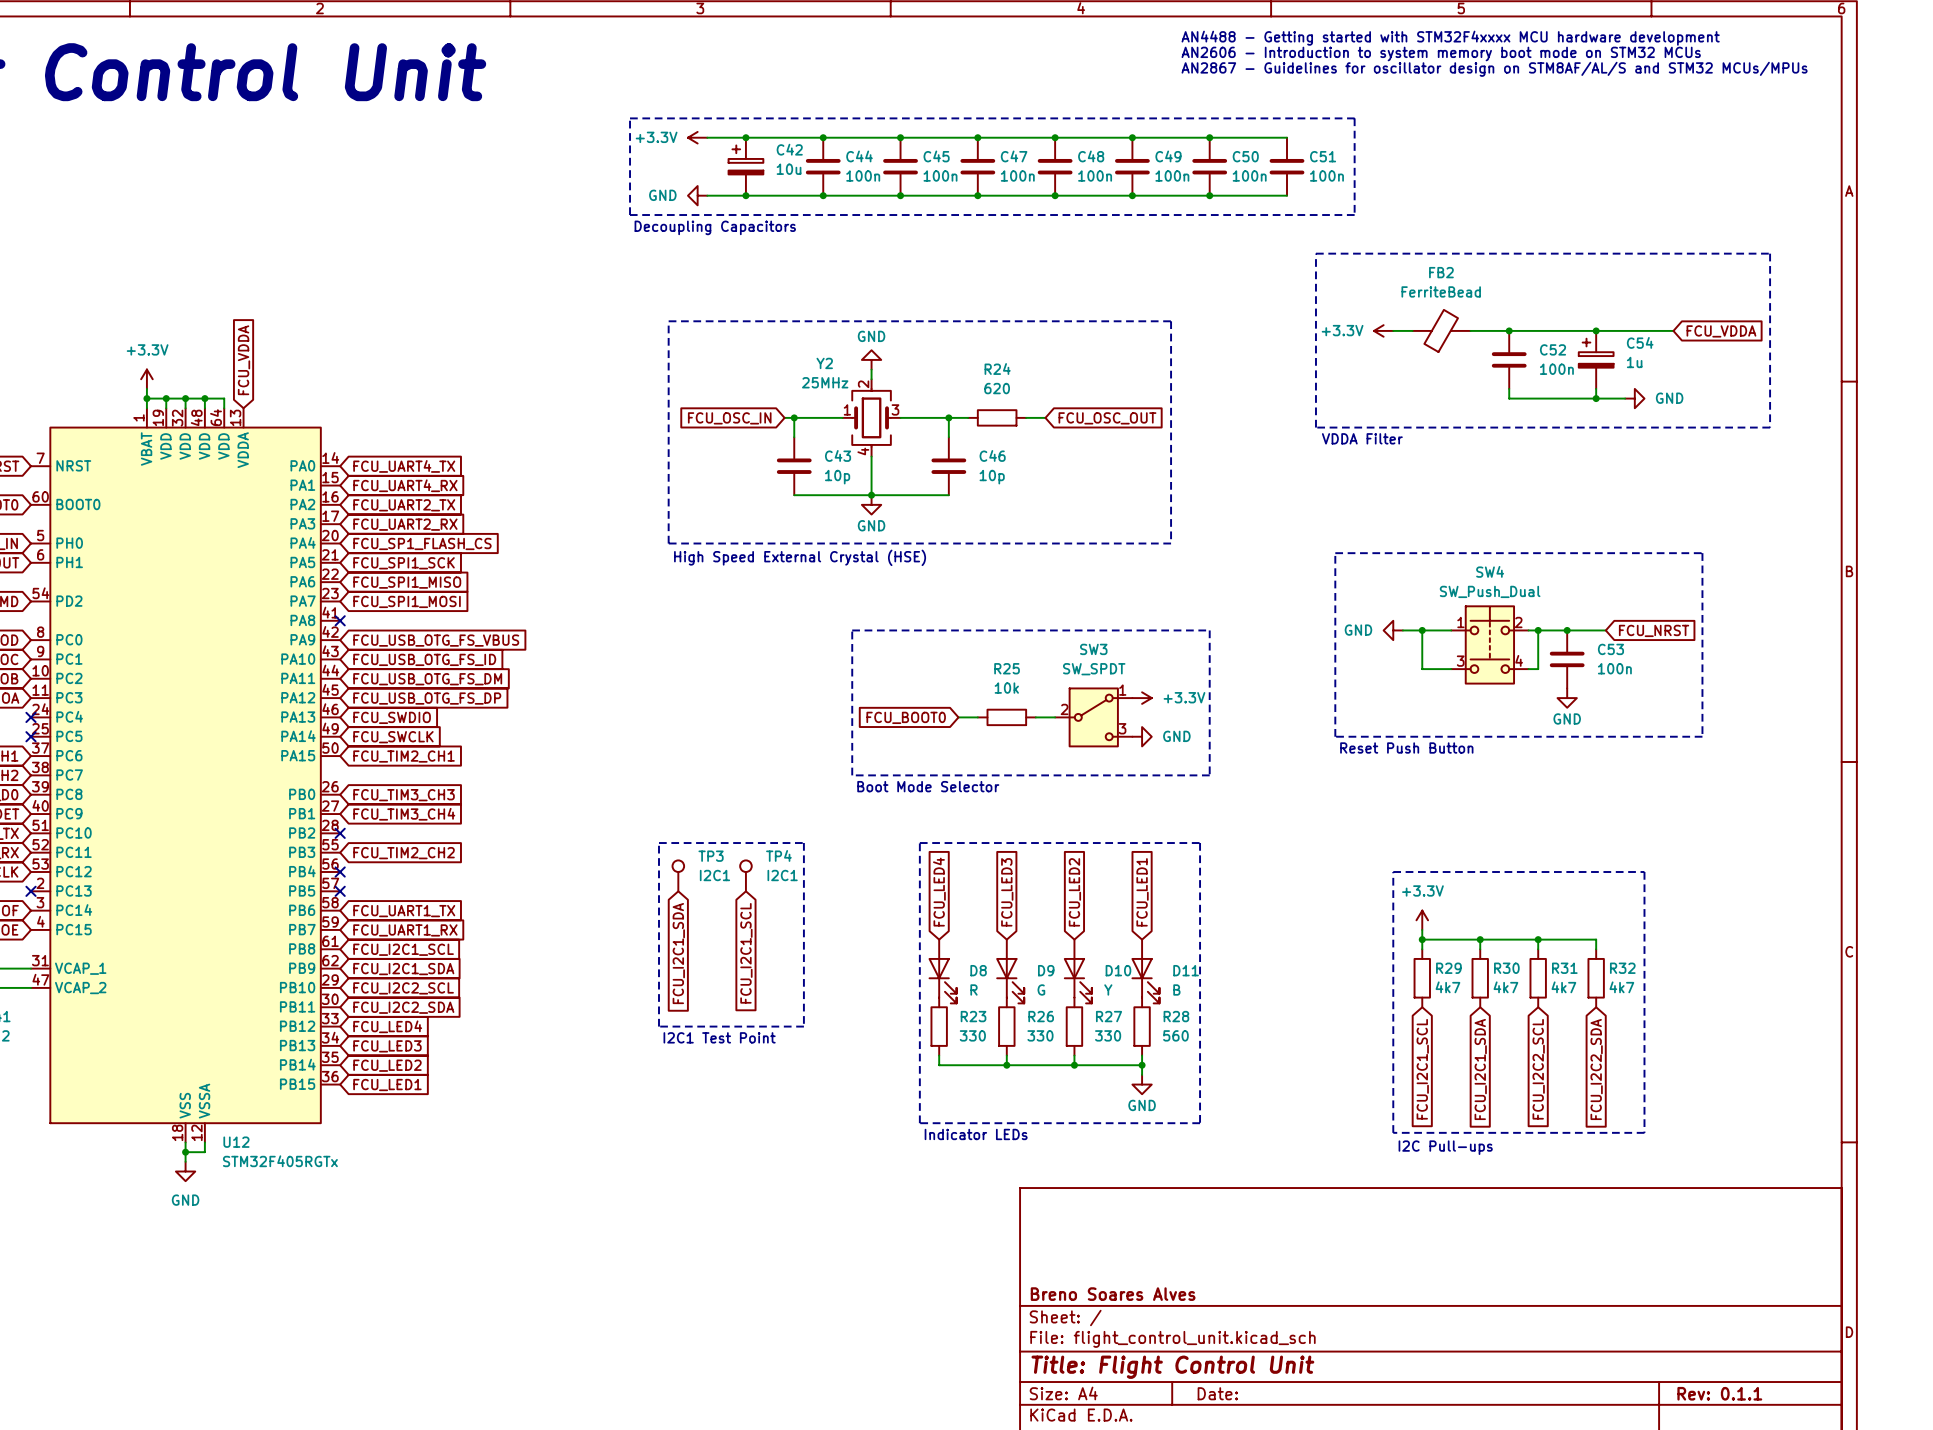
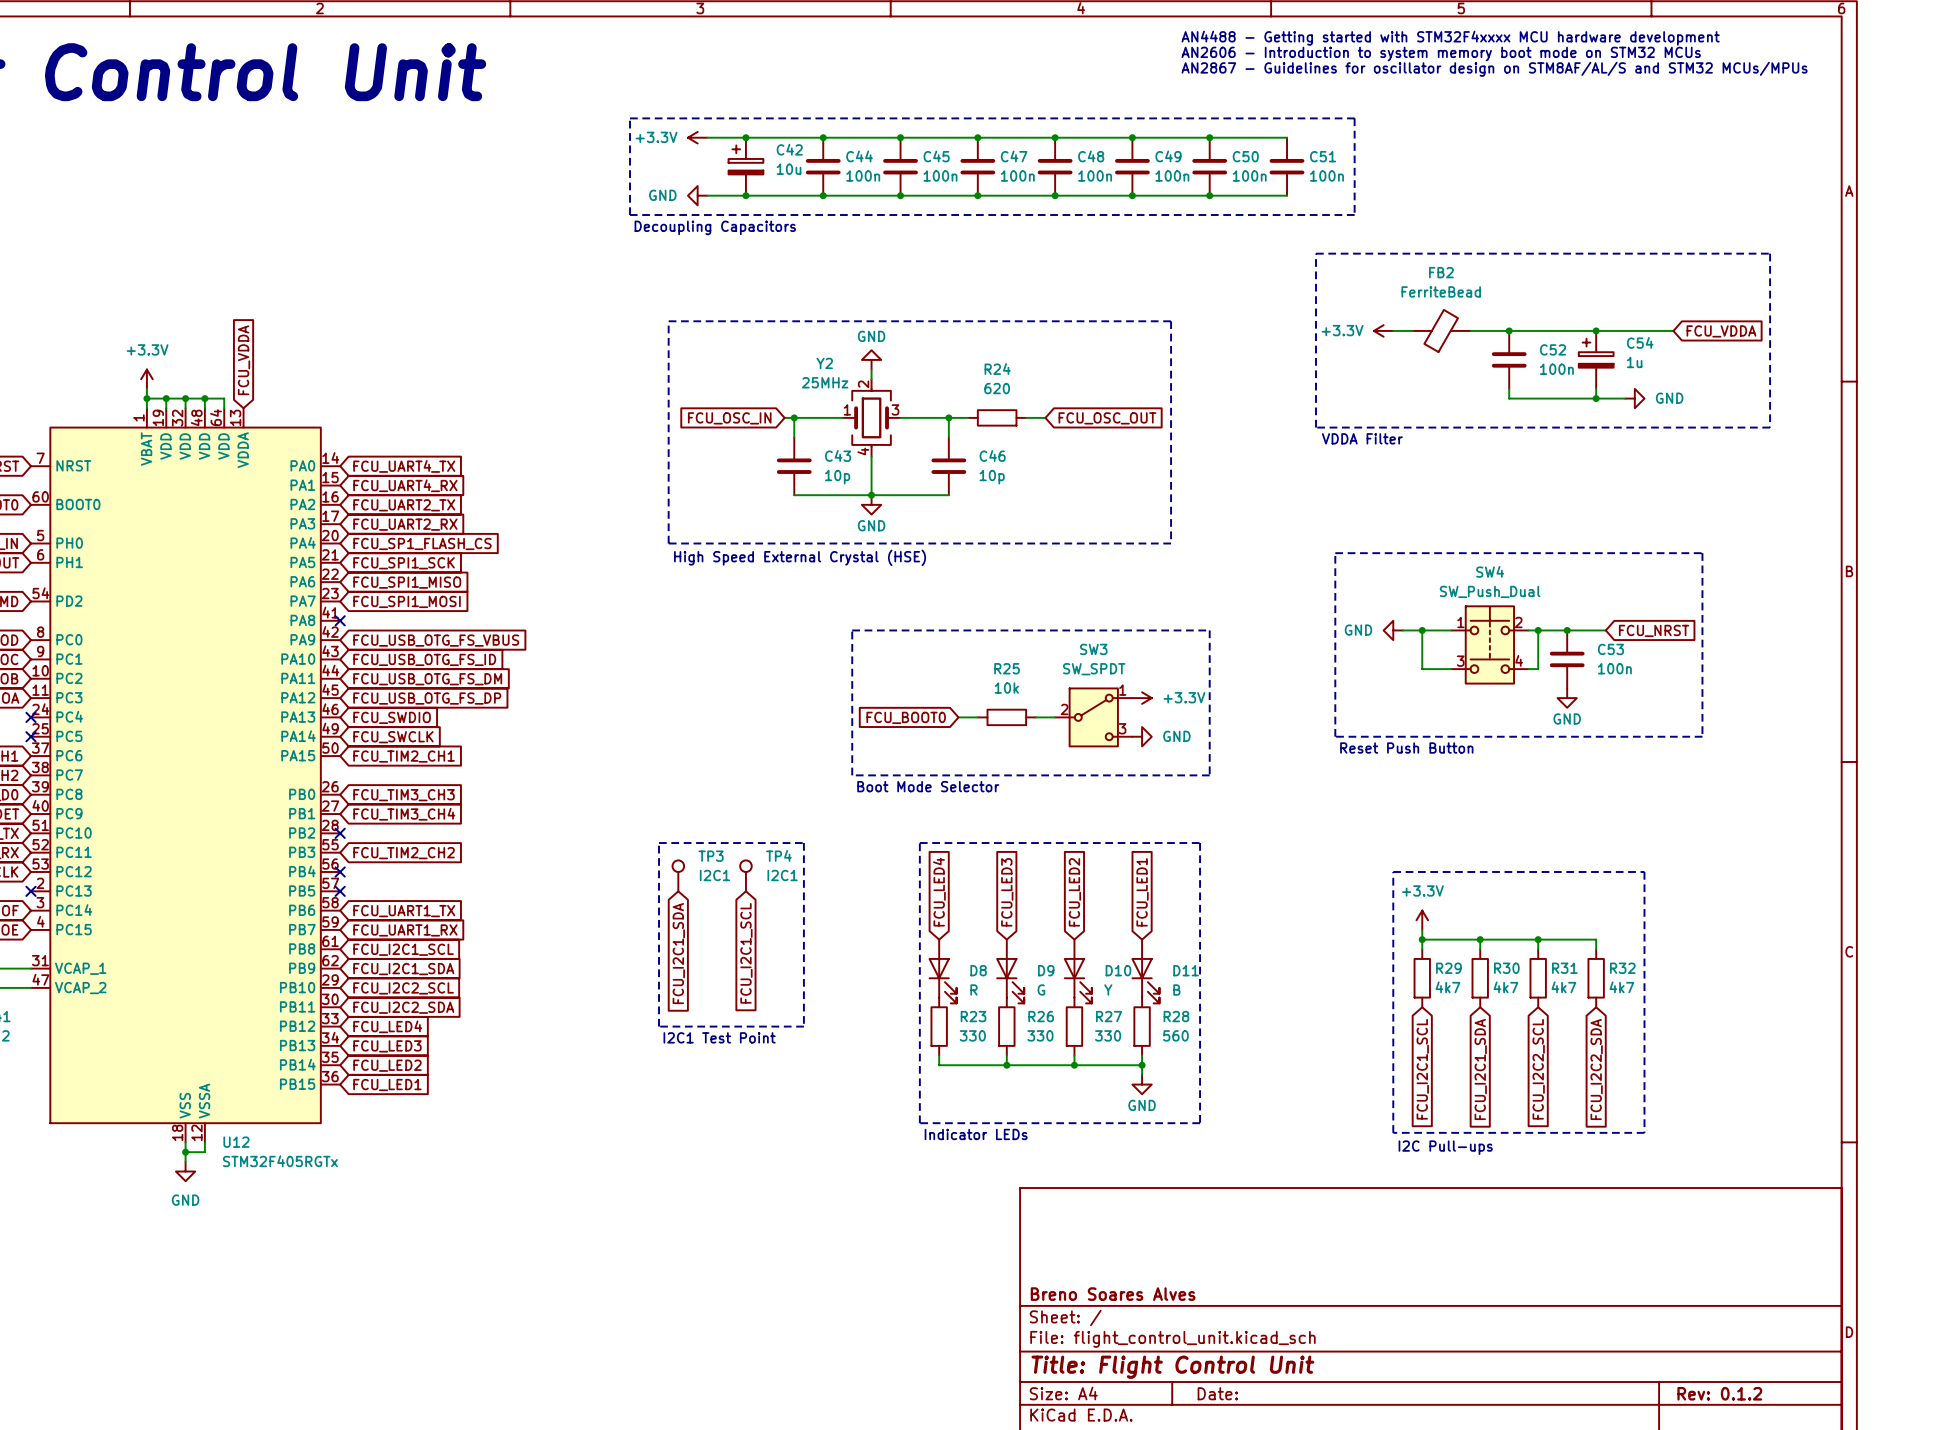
title block: Rev: 0.1.1 (1719, 1393) -> Rev: 0.1.2 (1719, 1393)

